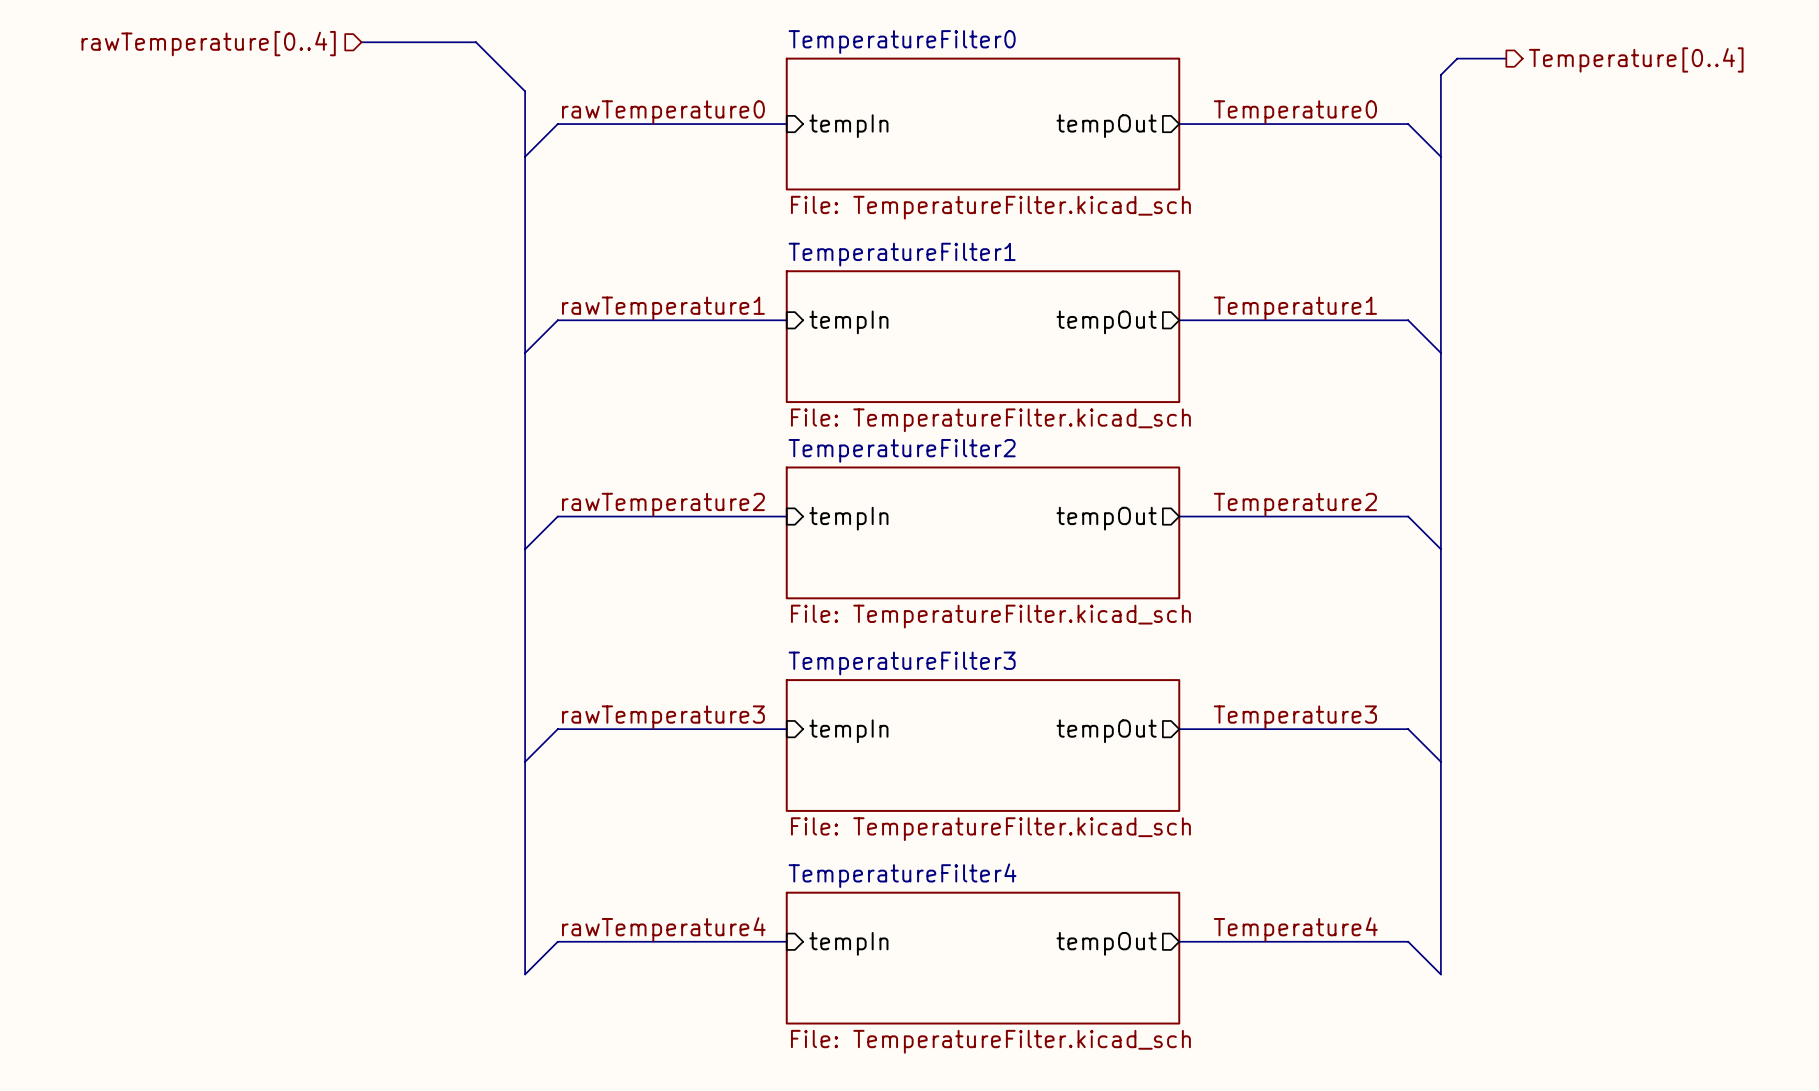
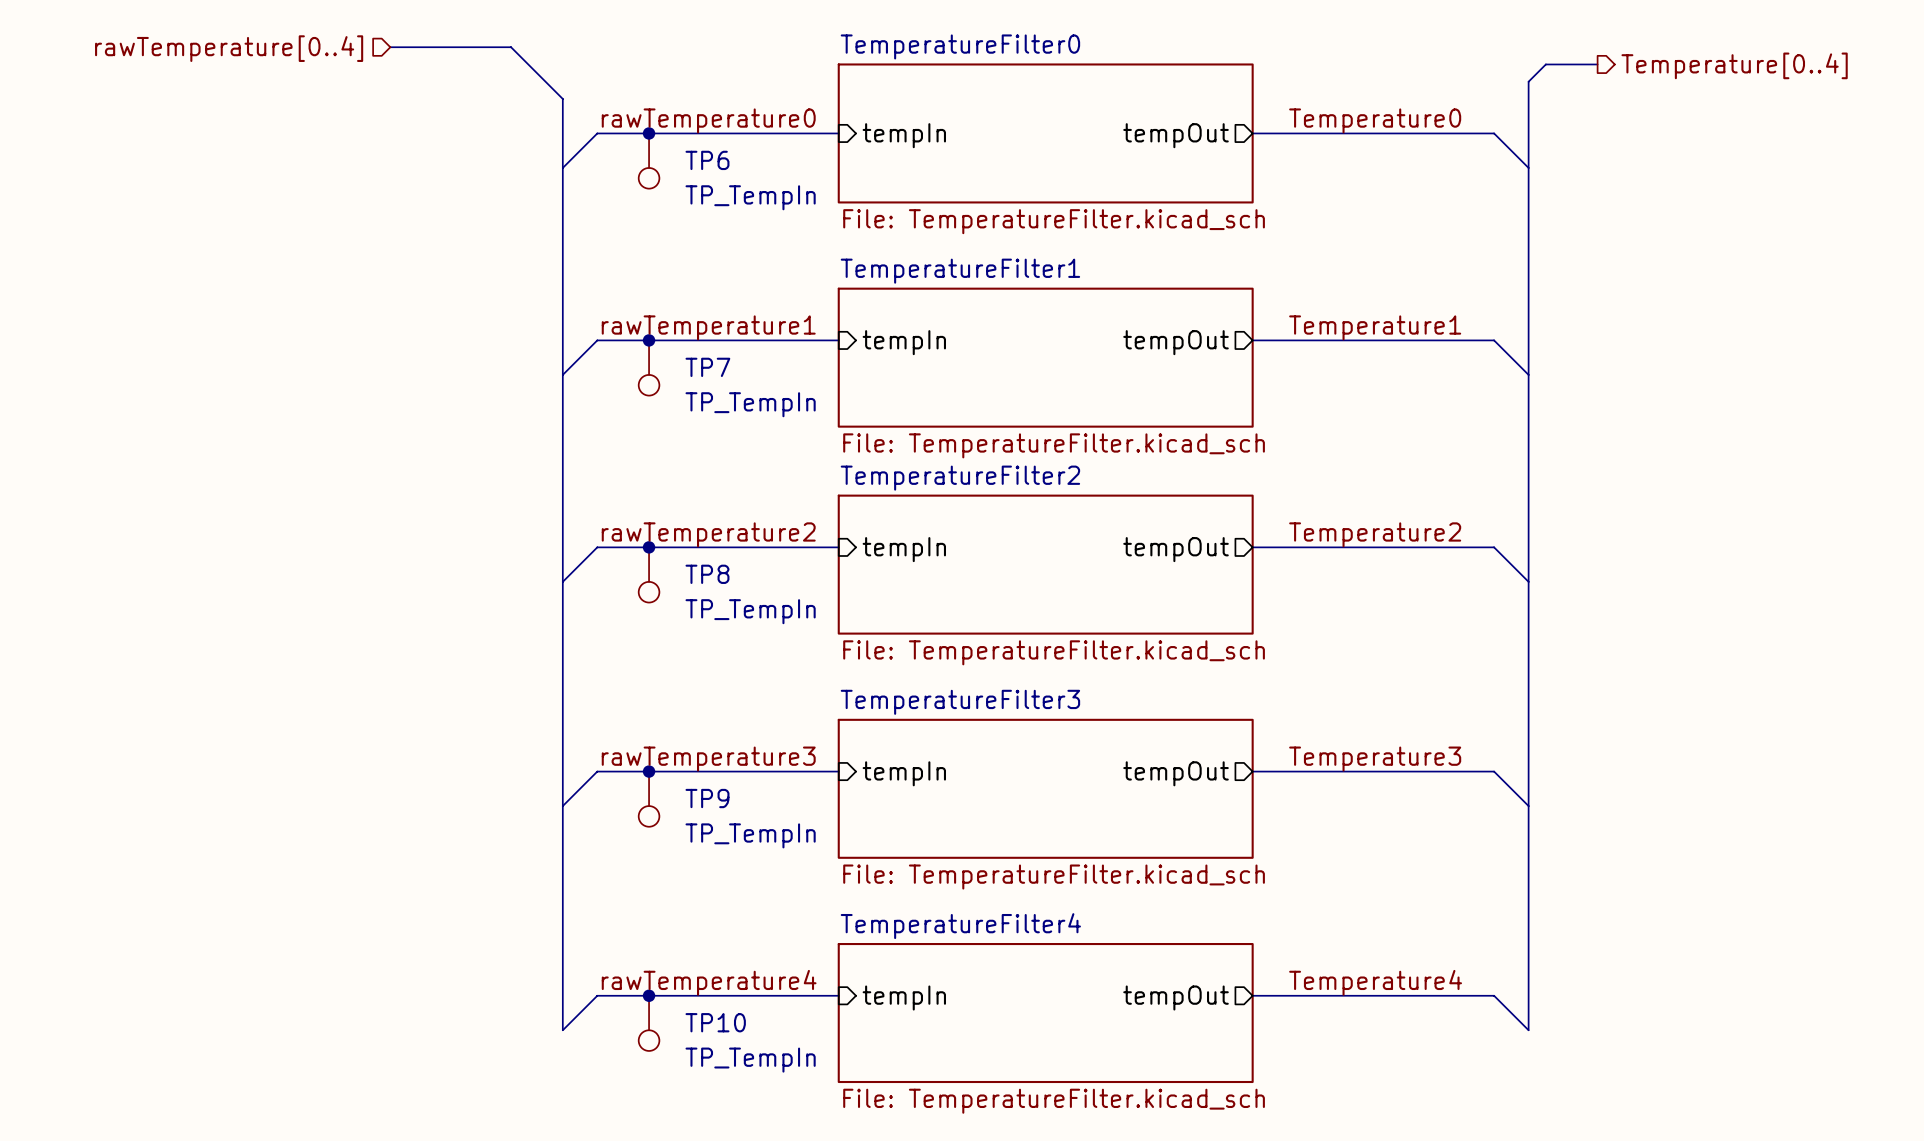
junction: none -> (649, 133)
TP6: none -> TP_TempIn (649, 161)
junction: none -> (649, 340)
TP7: none -> TP_TempIn (649, 368)
junction: none -> (649, 547)
TP8: none -> TP_TempIn (649, 574)
junction: none -> (649, 771)
TP9: none -> TP_TempIn (649, 799)
junction: none -> (649, 995)
TP10: none -> TP_TempIn (649, 1023)

